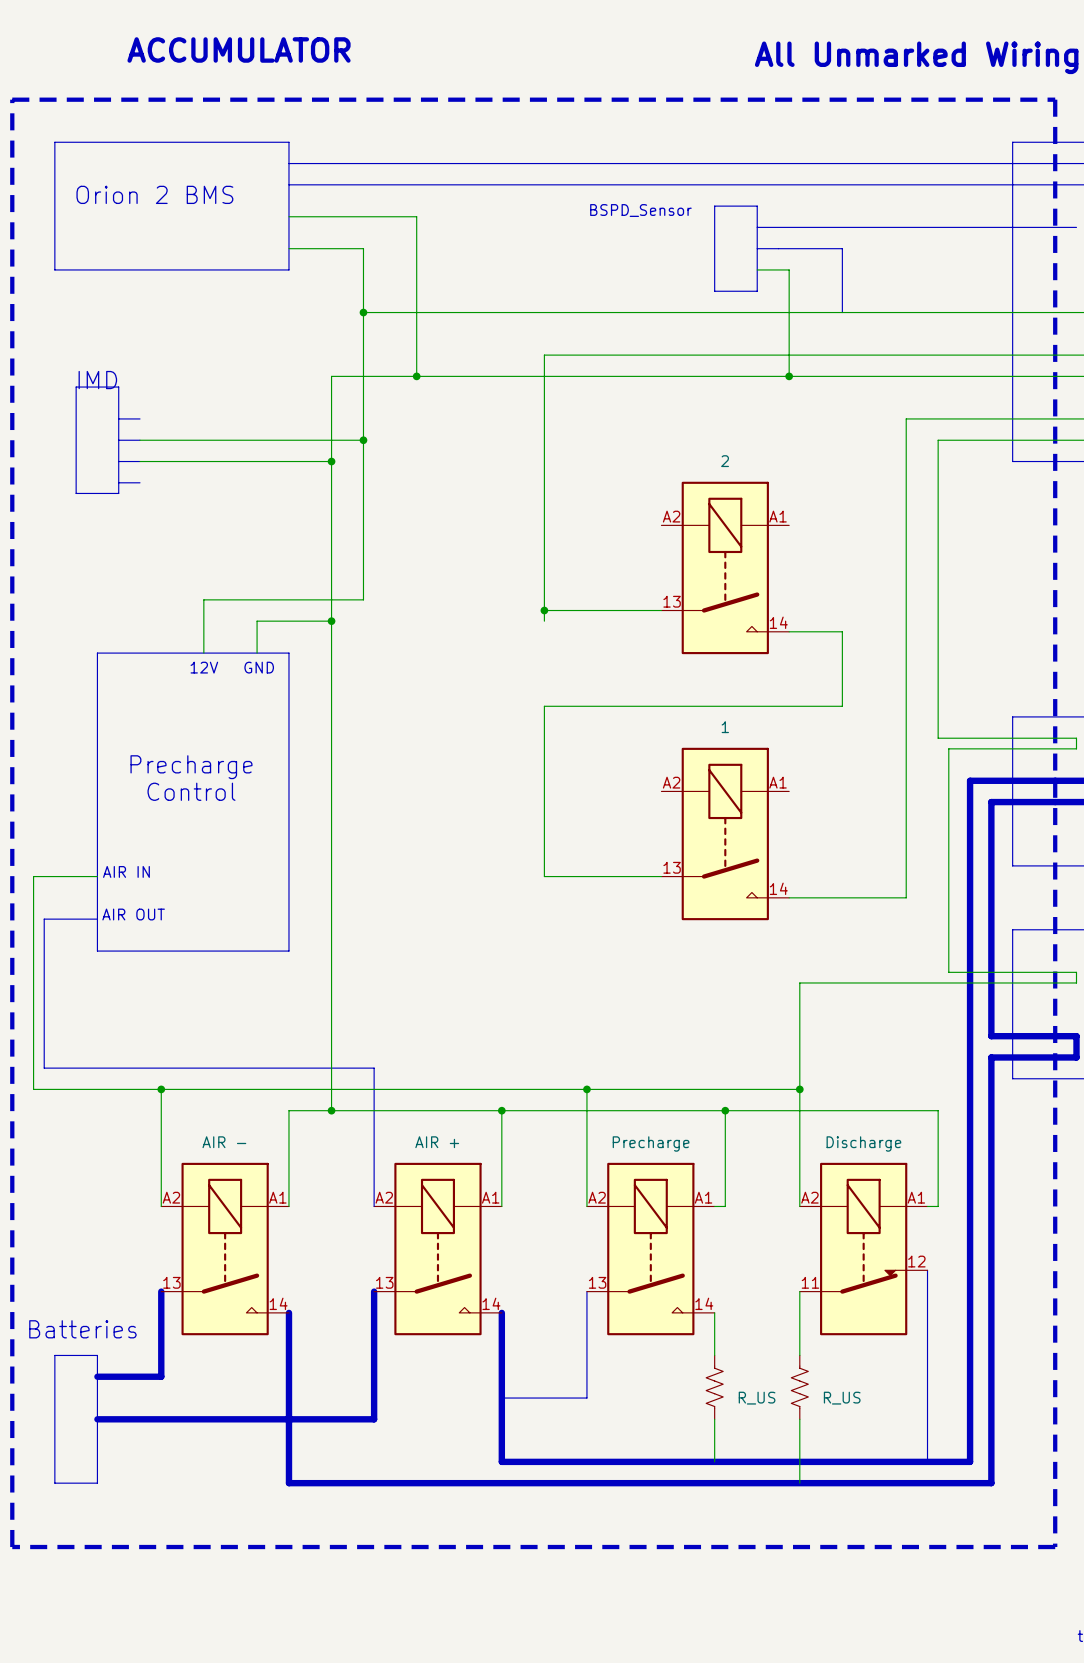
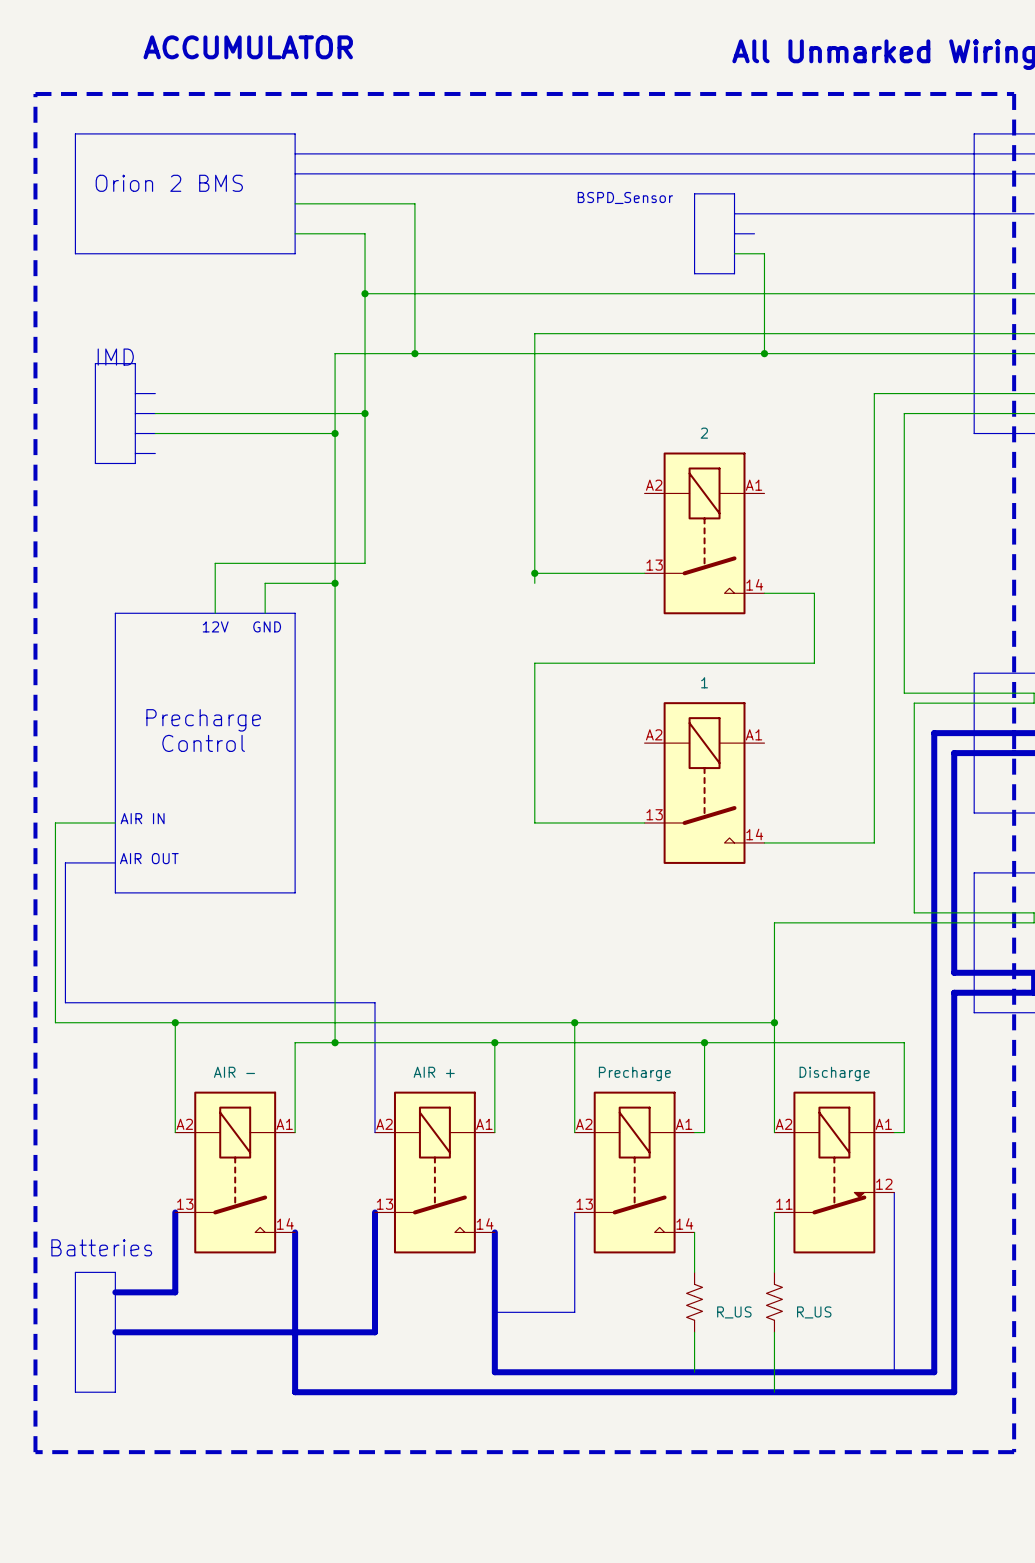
line: (778, 248) (842, 248) (842, 312) -> none

